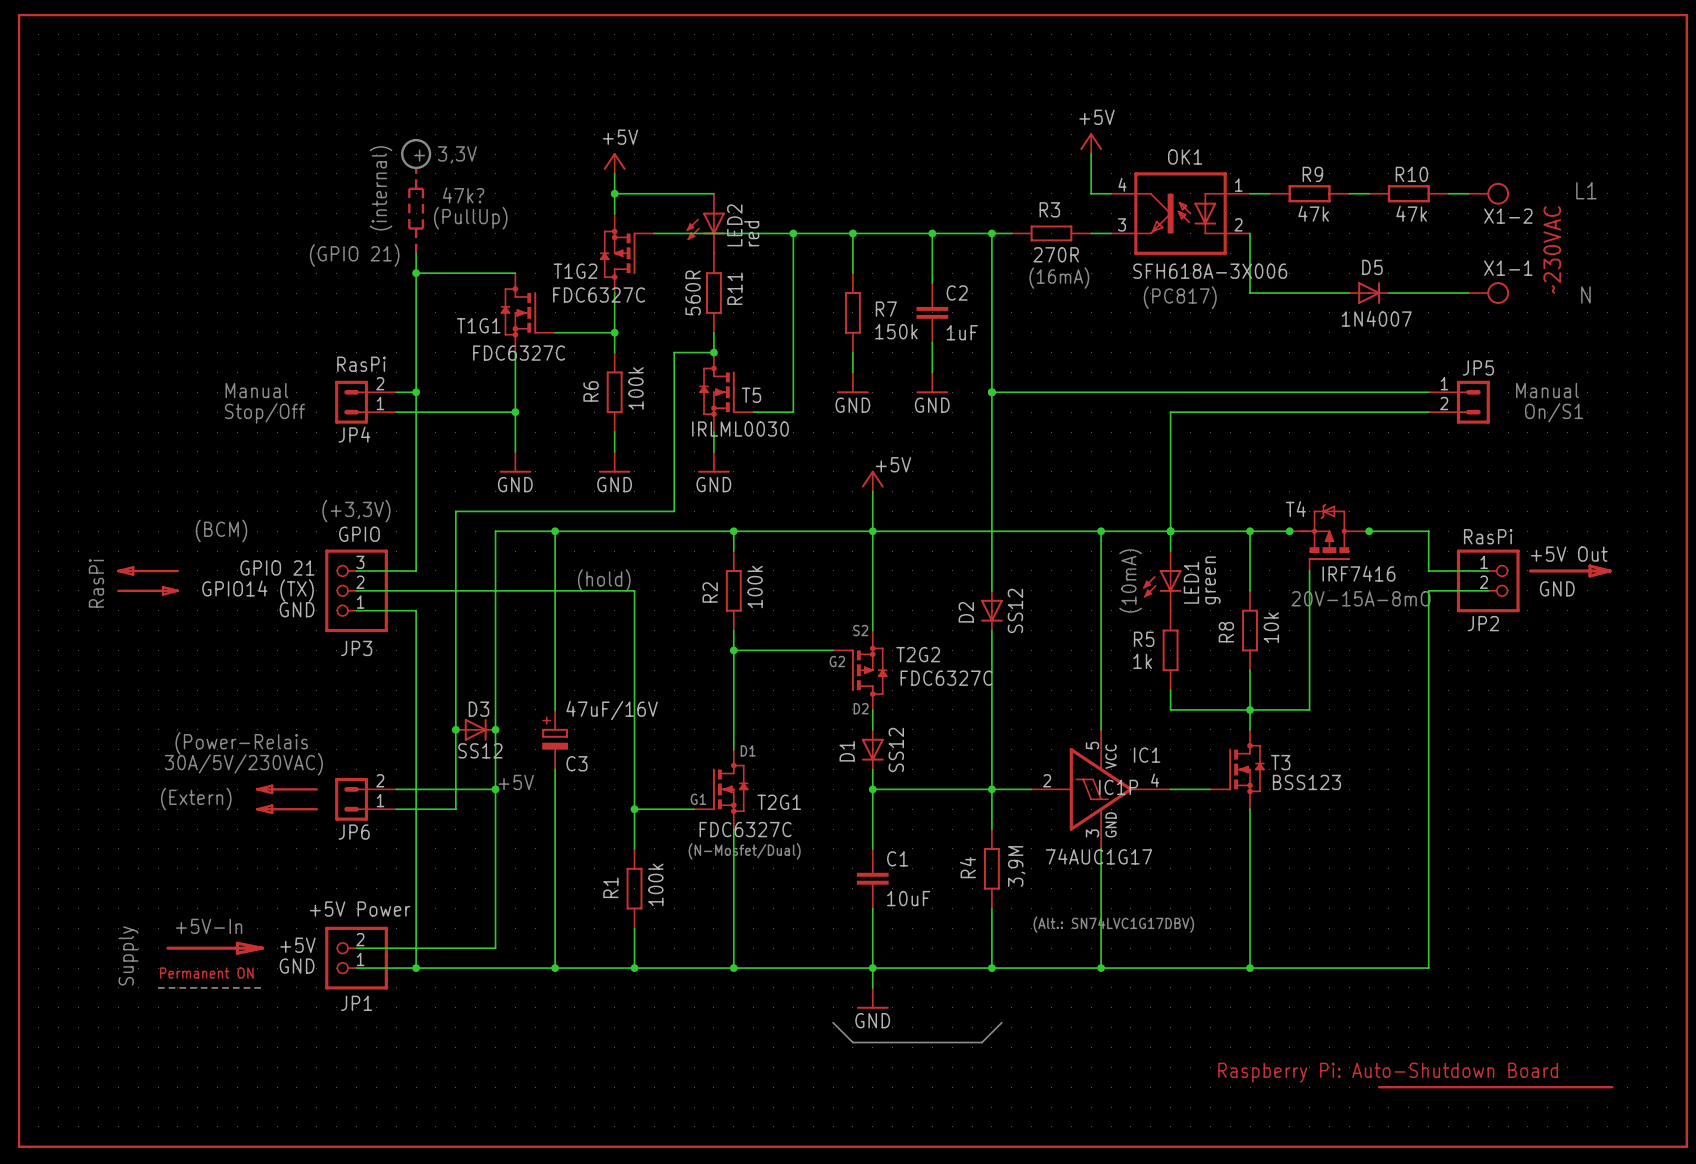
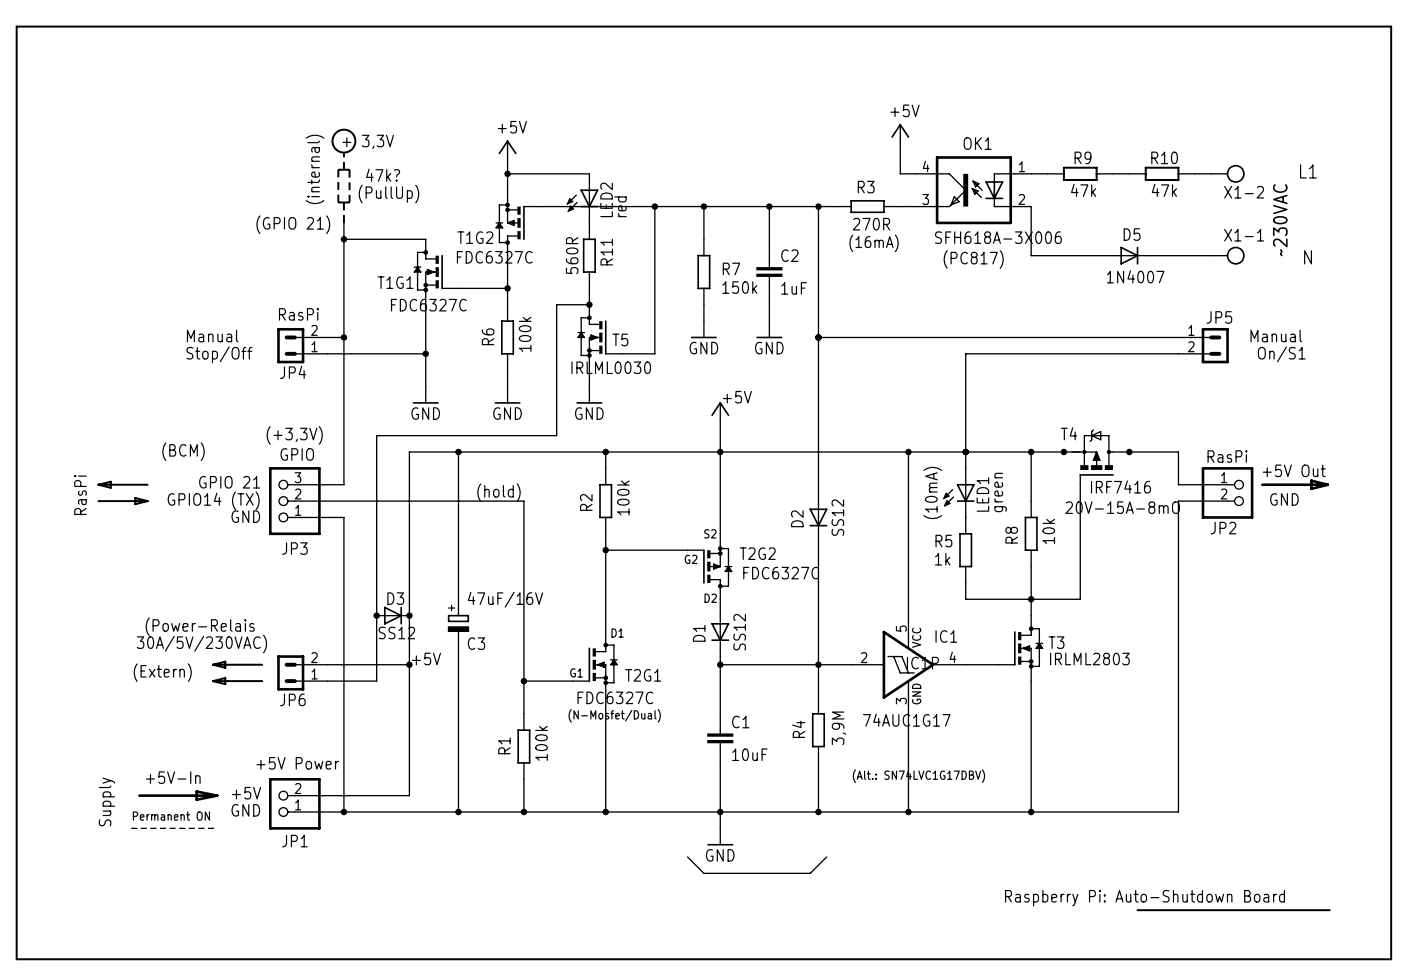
T3 value: BSS123 (1306, 782) -> IRLML2803 (1089, 659)

